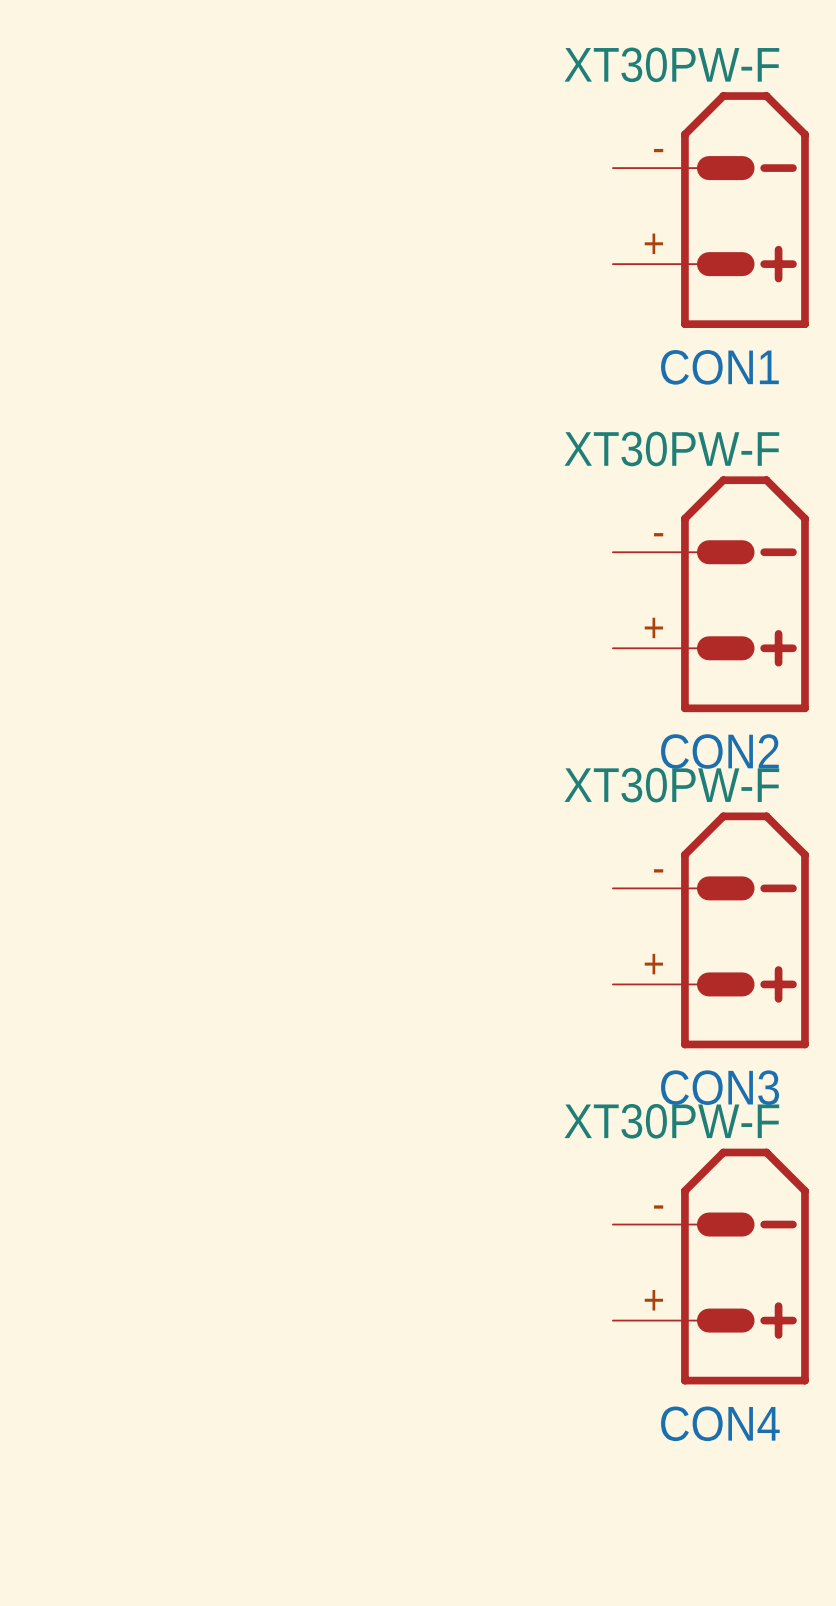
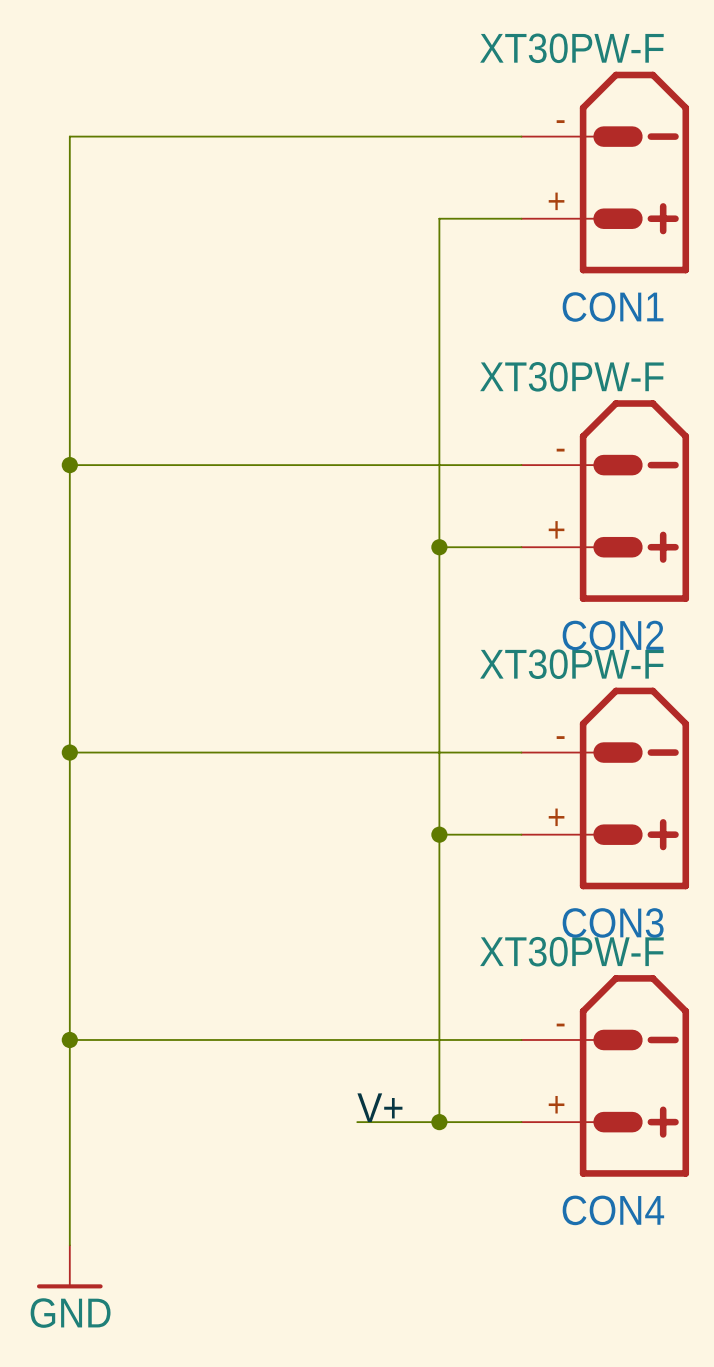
wire: none -> (521, 136) (69, 136) (69, 1245)
wire: none -> (521, 218) (439, 218) (439, 1122)
wire: none -> (69, 465) (521, 465)
junction: none -> (69, 465)
wire: none -> (439, 547) (521, 547)
junction: none -> (439, 547)
wire: none -> (69, 752) (521, 752)
junction: none -> (69, 752)
wire: none -> (439, 834) (521, 834)
junction: none -> (439, 834)
wire: none -> (69, 1039) (521, 1039)
junction: none -> (69, 1039)
label: none -> V+ (379, 1107)
wire: none -> (357, 1122) (521, 1122)
junction: none -> (439, 1122)
power symbol: none -> GND (69, 1266)

